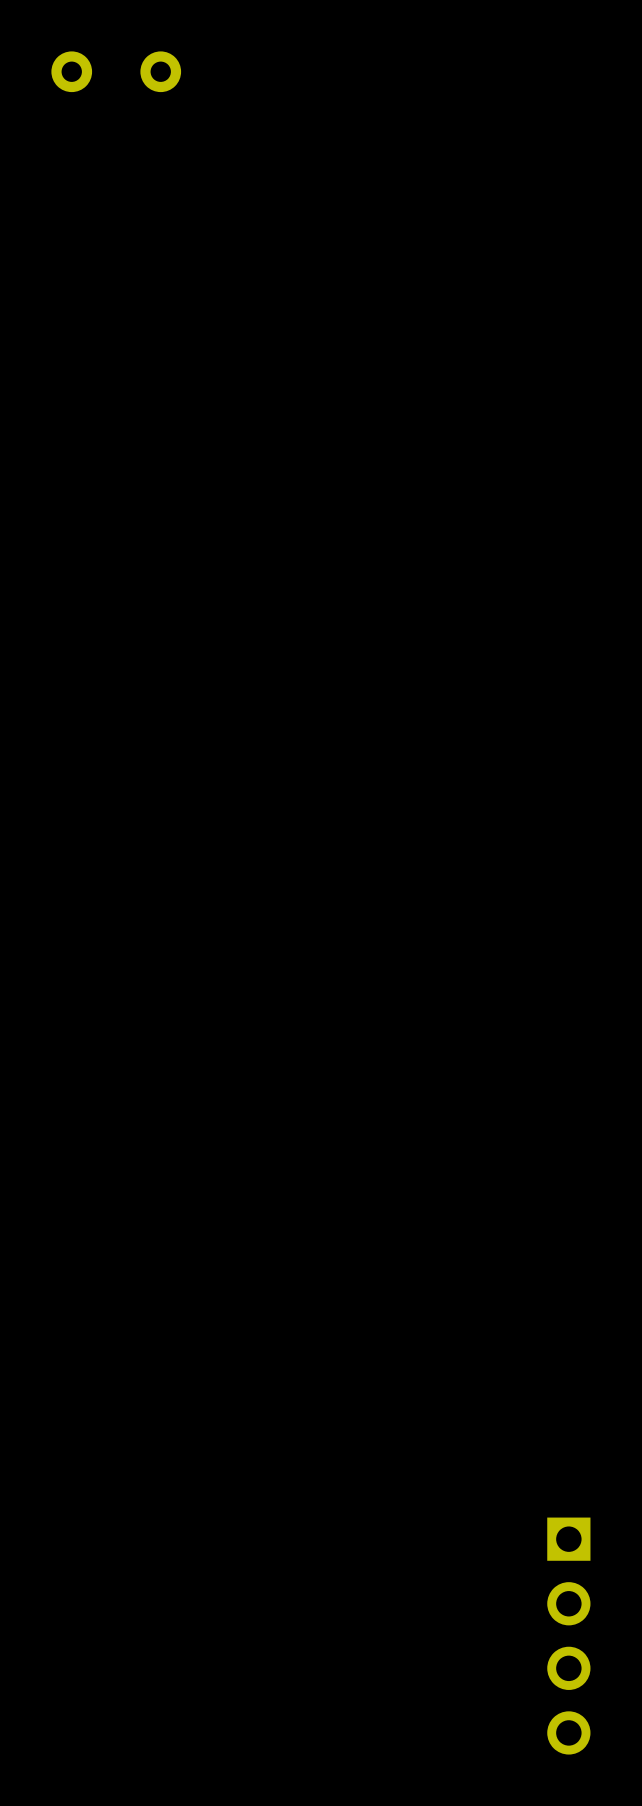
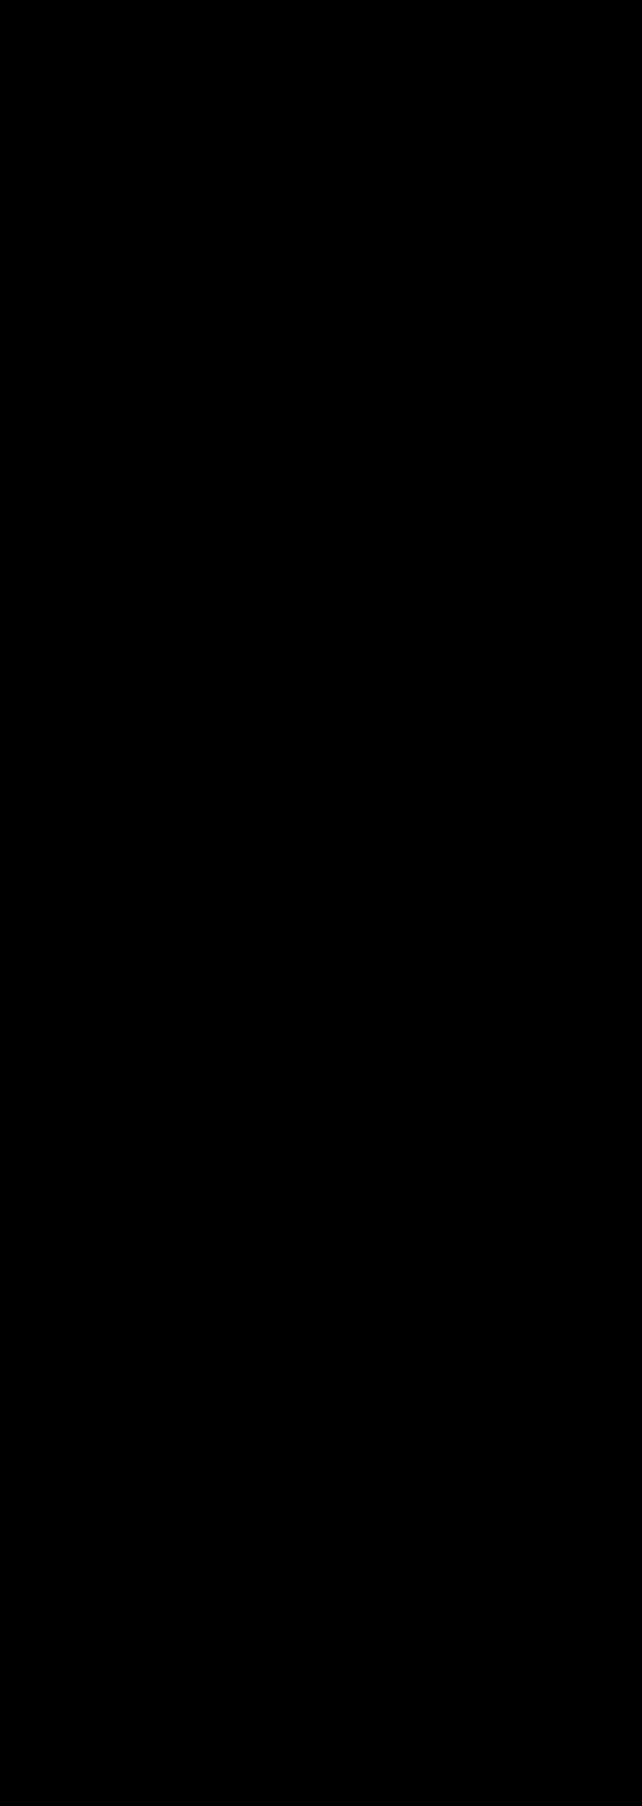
part: (116, 71) -> none
part: (568, 1636) -> none

